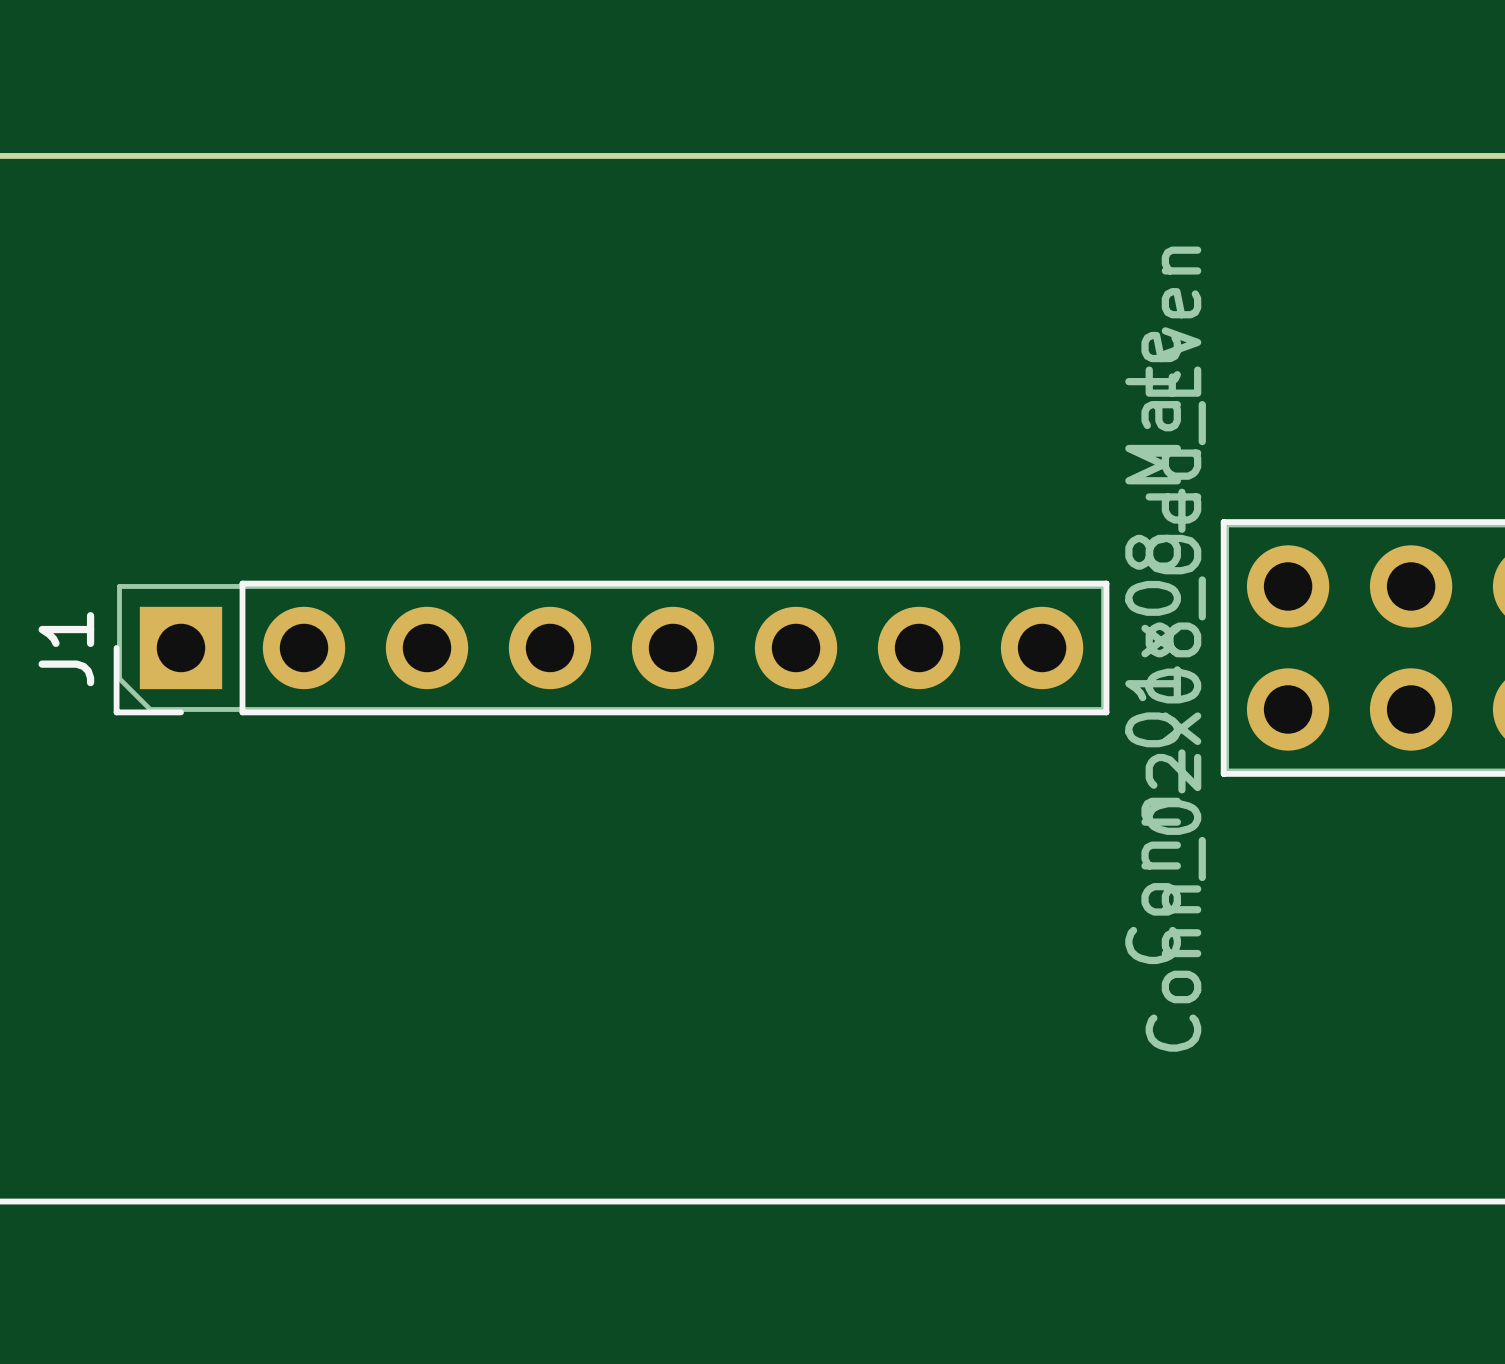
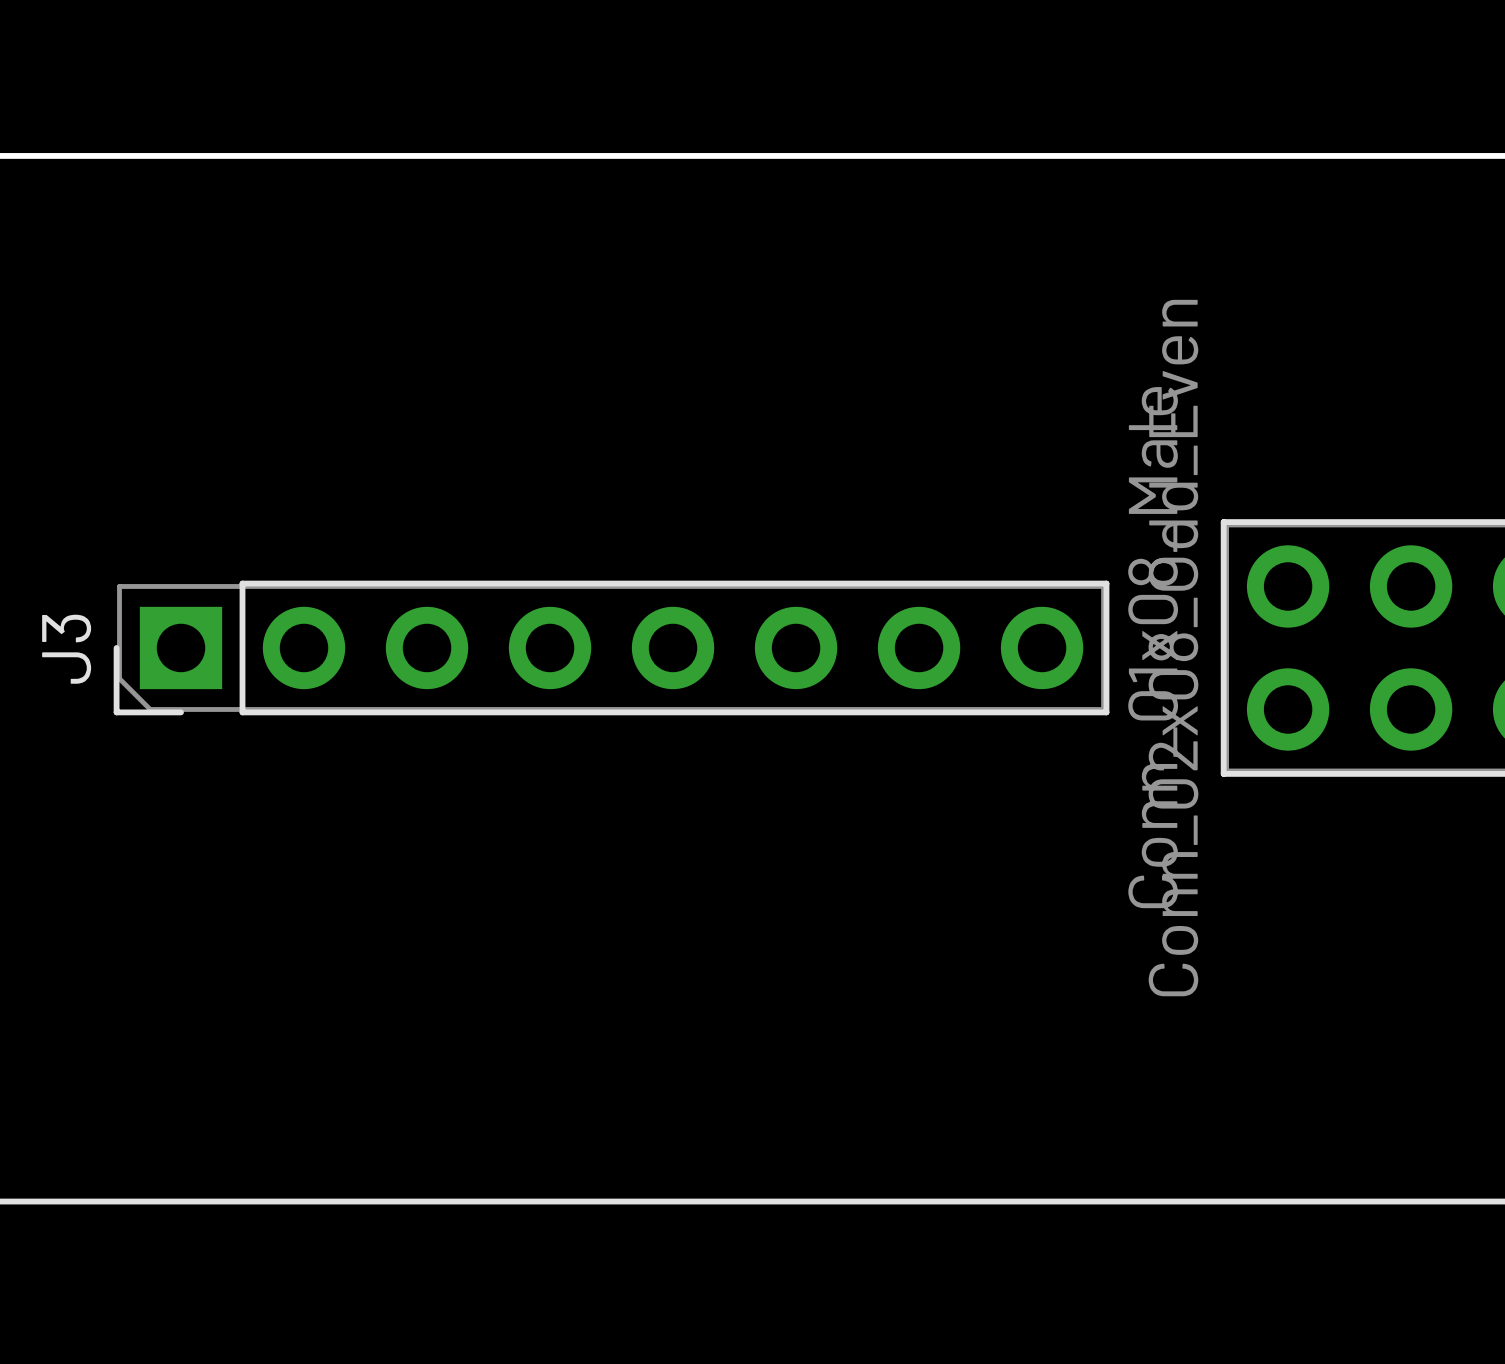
J1 name: J1 (66, 649) -> J3 (66, 649)

